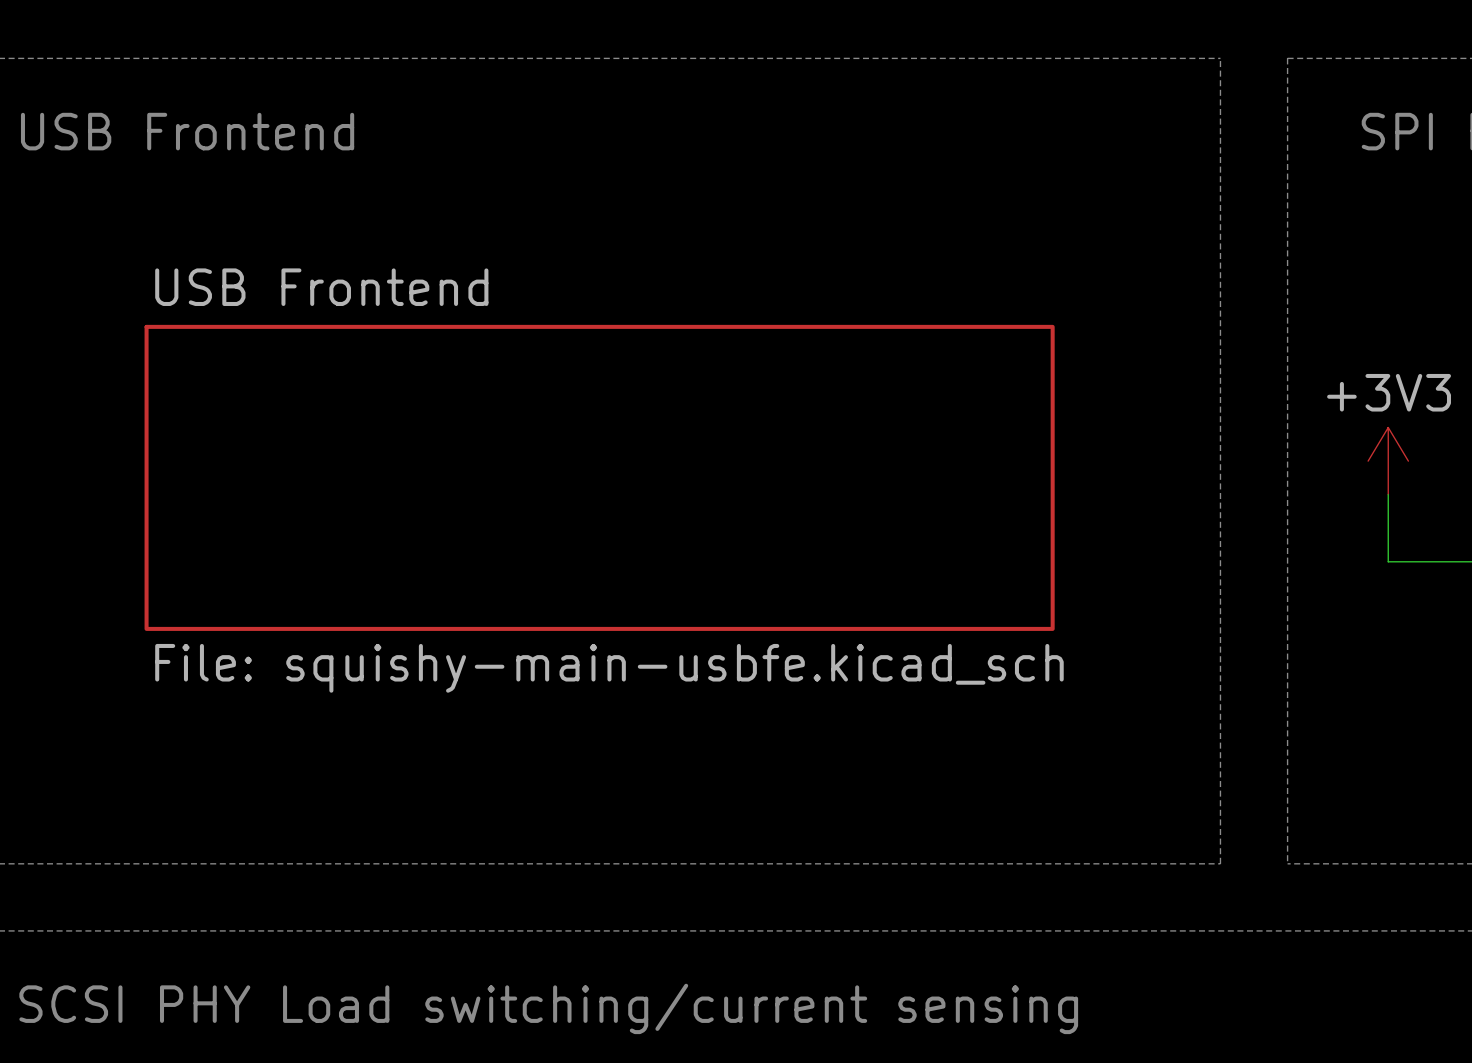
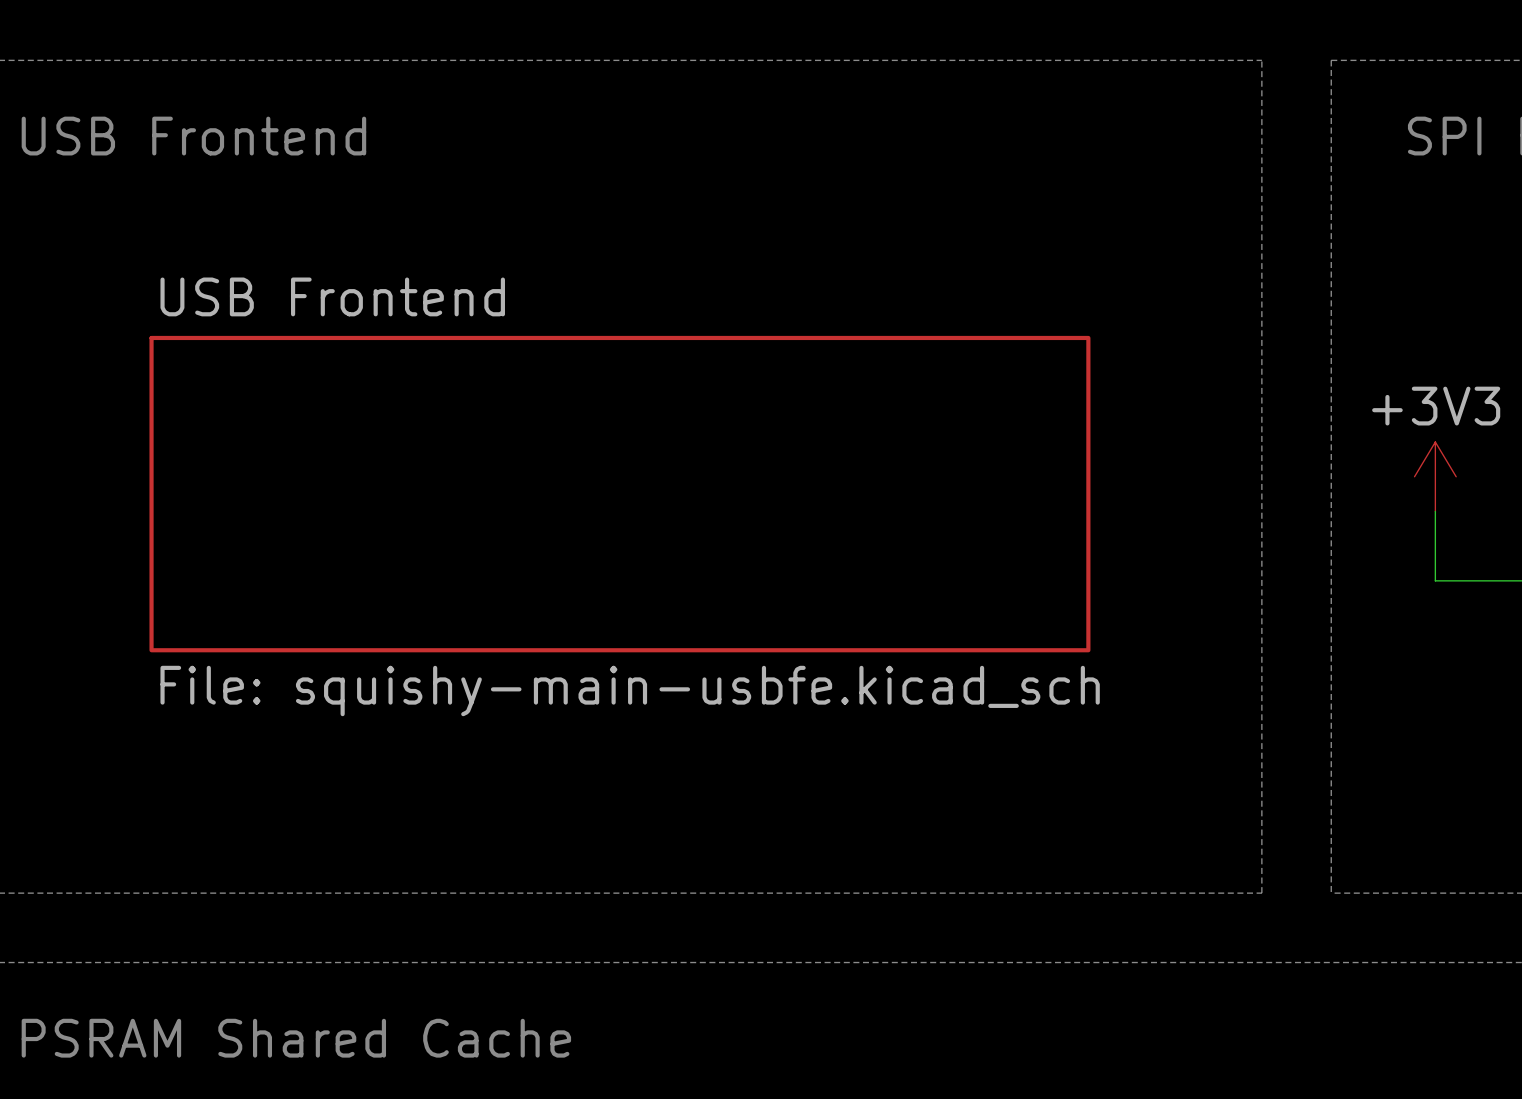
text: SCSI PHY Load switching/current sensing (548, 1008) -> PSRAM Shared Cache (296, 1038)

